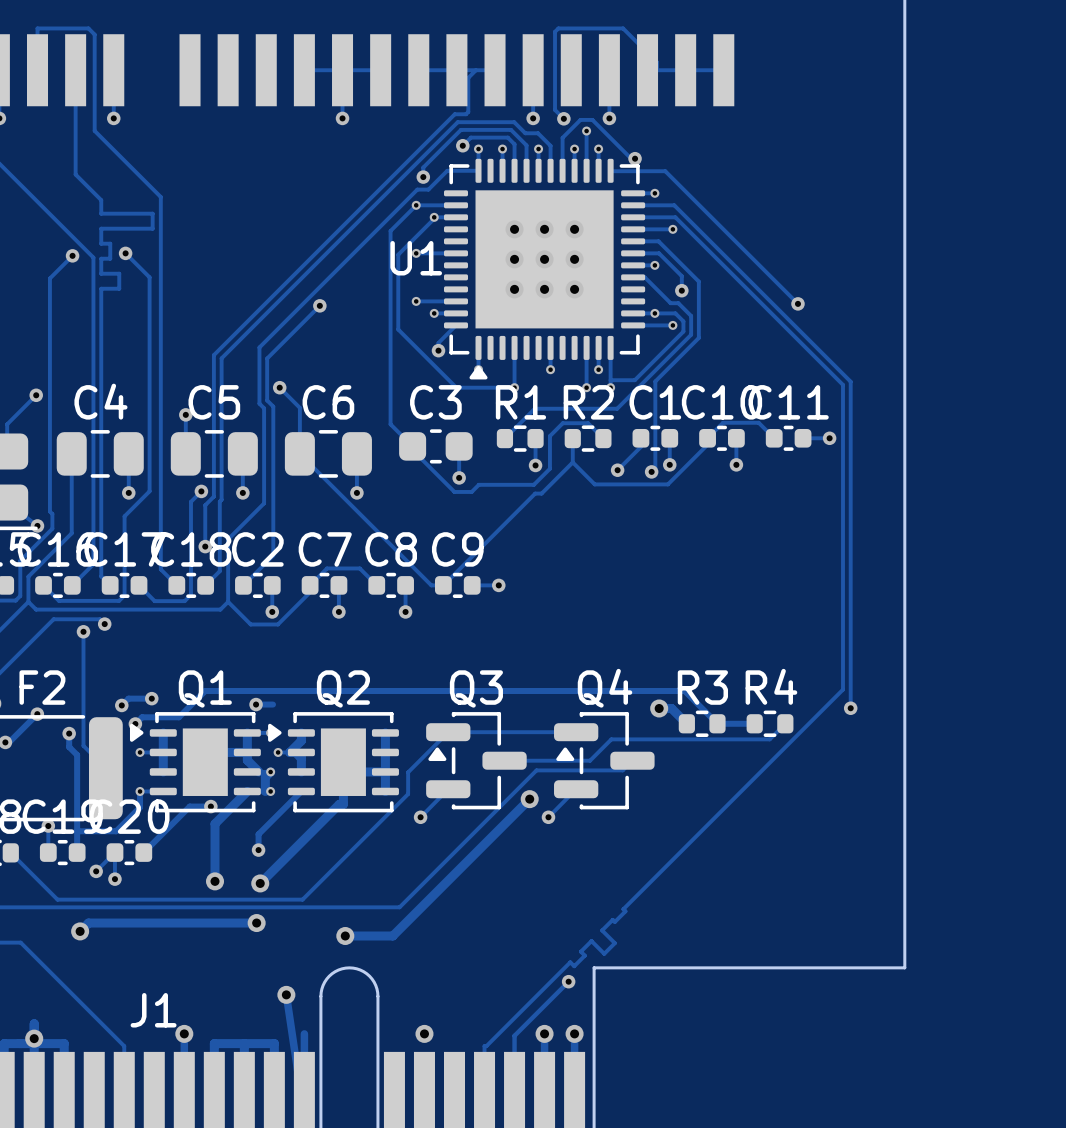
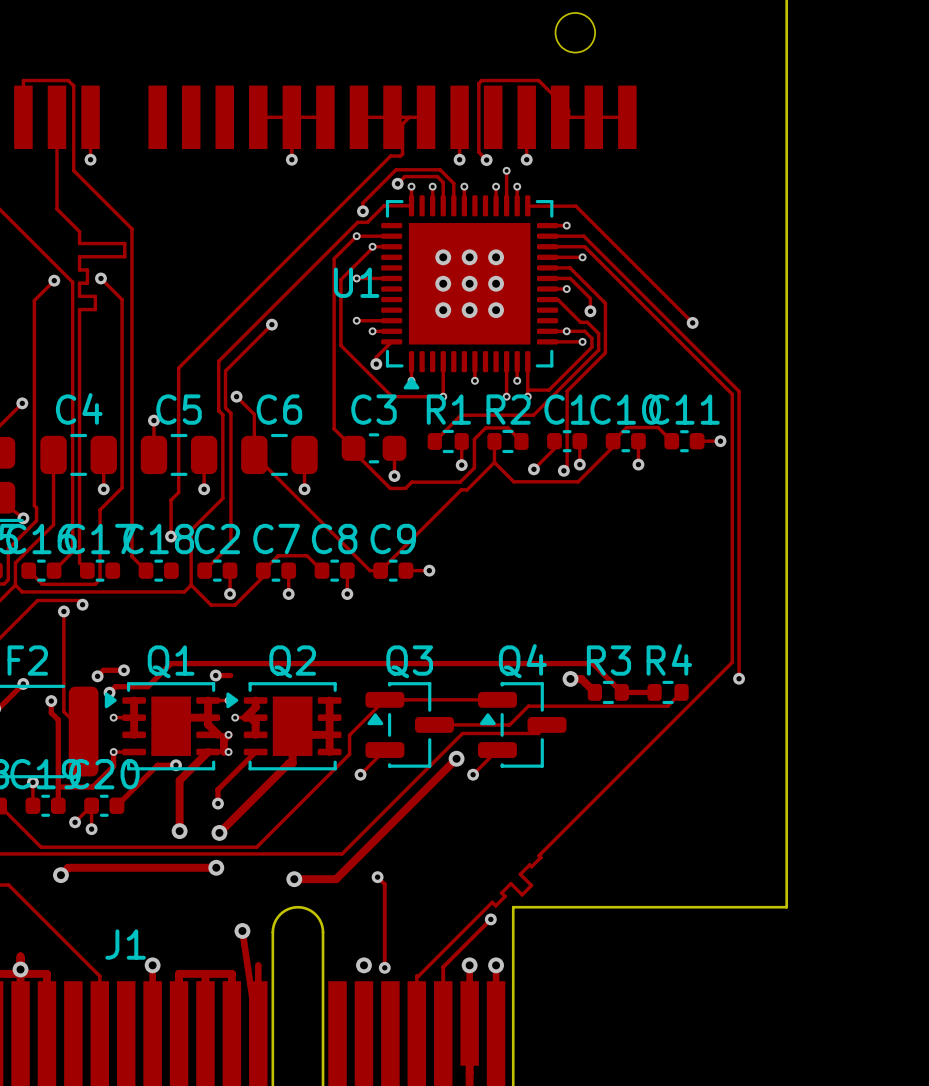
track: (635, 158) (631, 158) (592, 119) (580, 119) (562, 137) (562, 170) -> none
via: (635, 158) -> none
track: (550, 170) (550, 145) (538, 133) (525, 133) (514, 122) (457, 122) (221, 358) (219, 571) (205, 585) -> none
track: (201, 491) (190, 501) (190, 594) (184, 601) (154, 601) (138, 585) -> none
via: (201, 491) -> none
track: none -> (377, 877) (384, 884) (384, 967)
via: none -> (377, 877)
via: none -> (384, 967)

